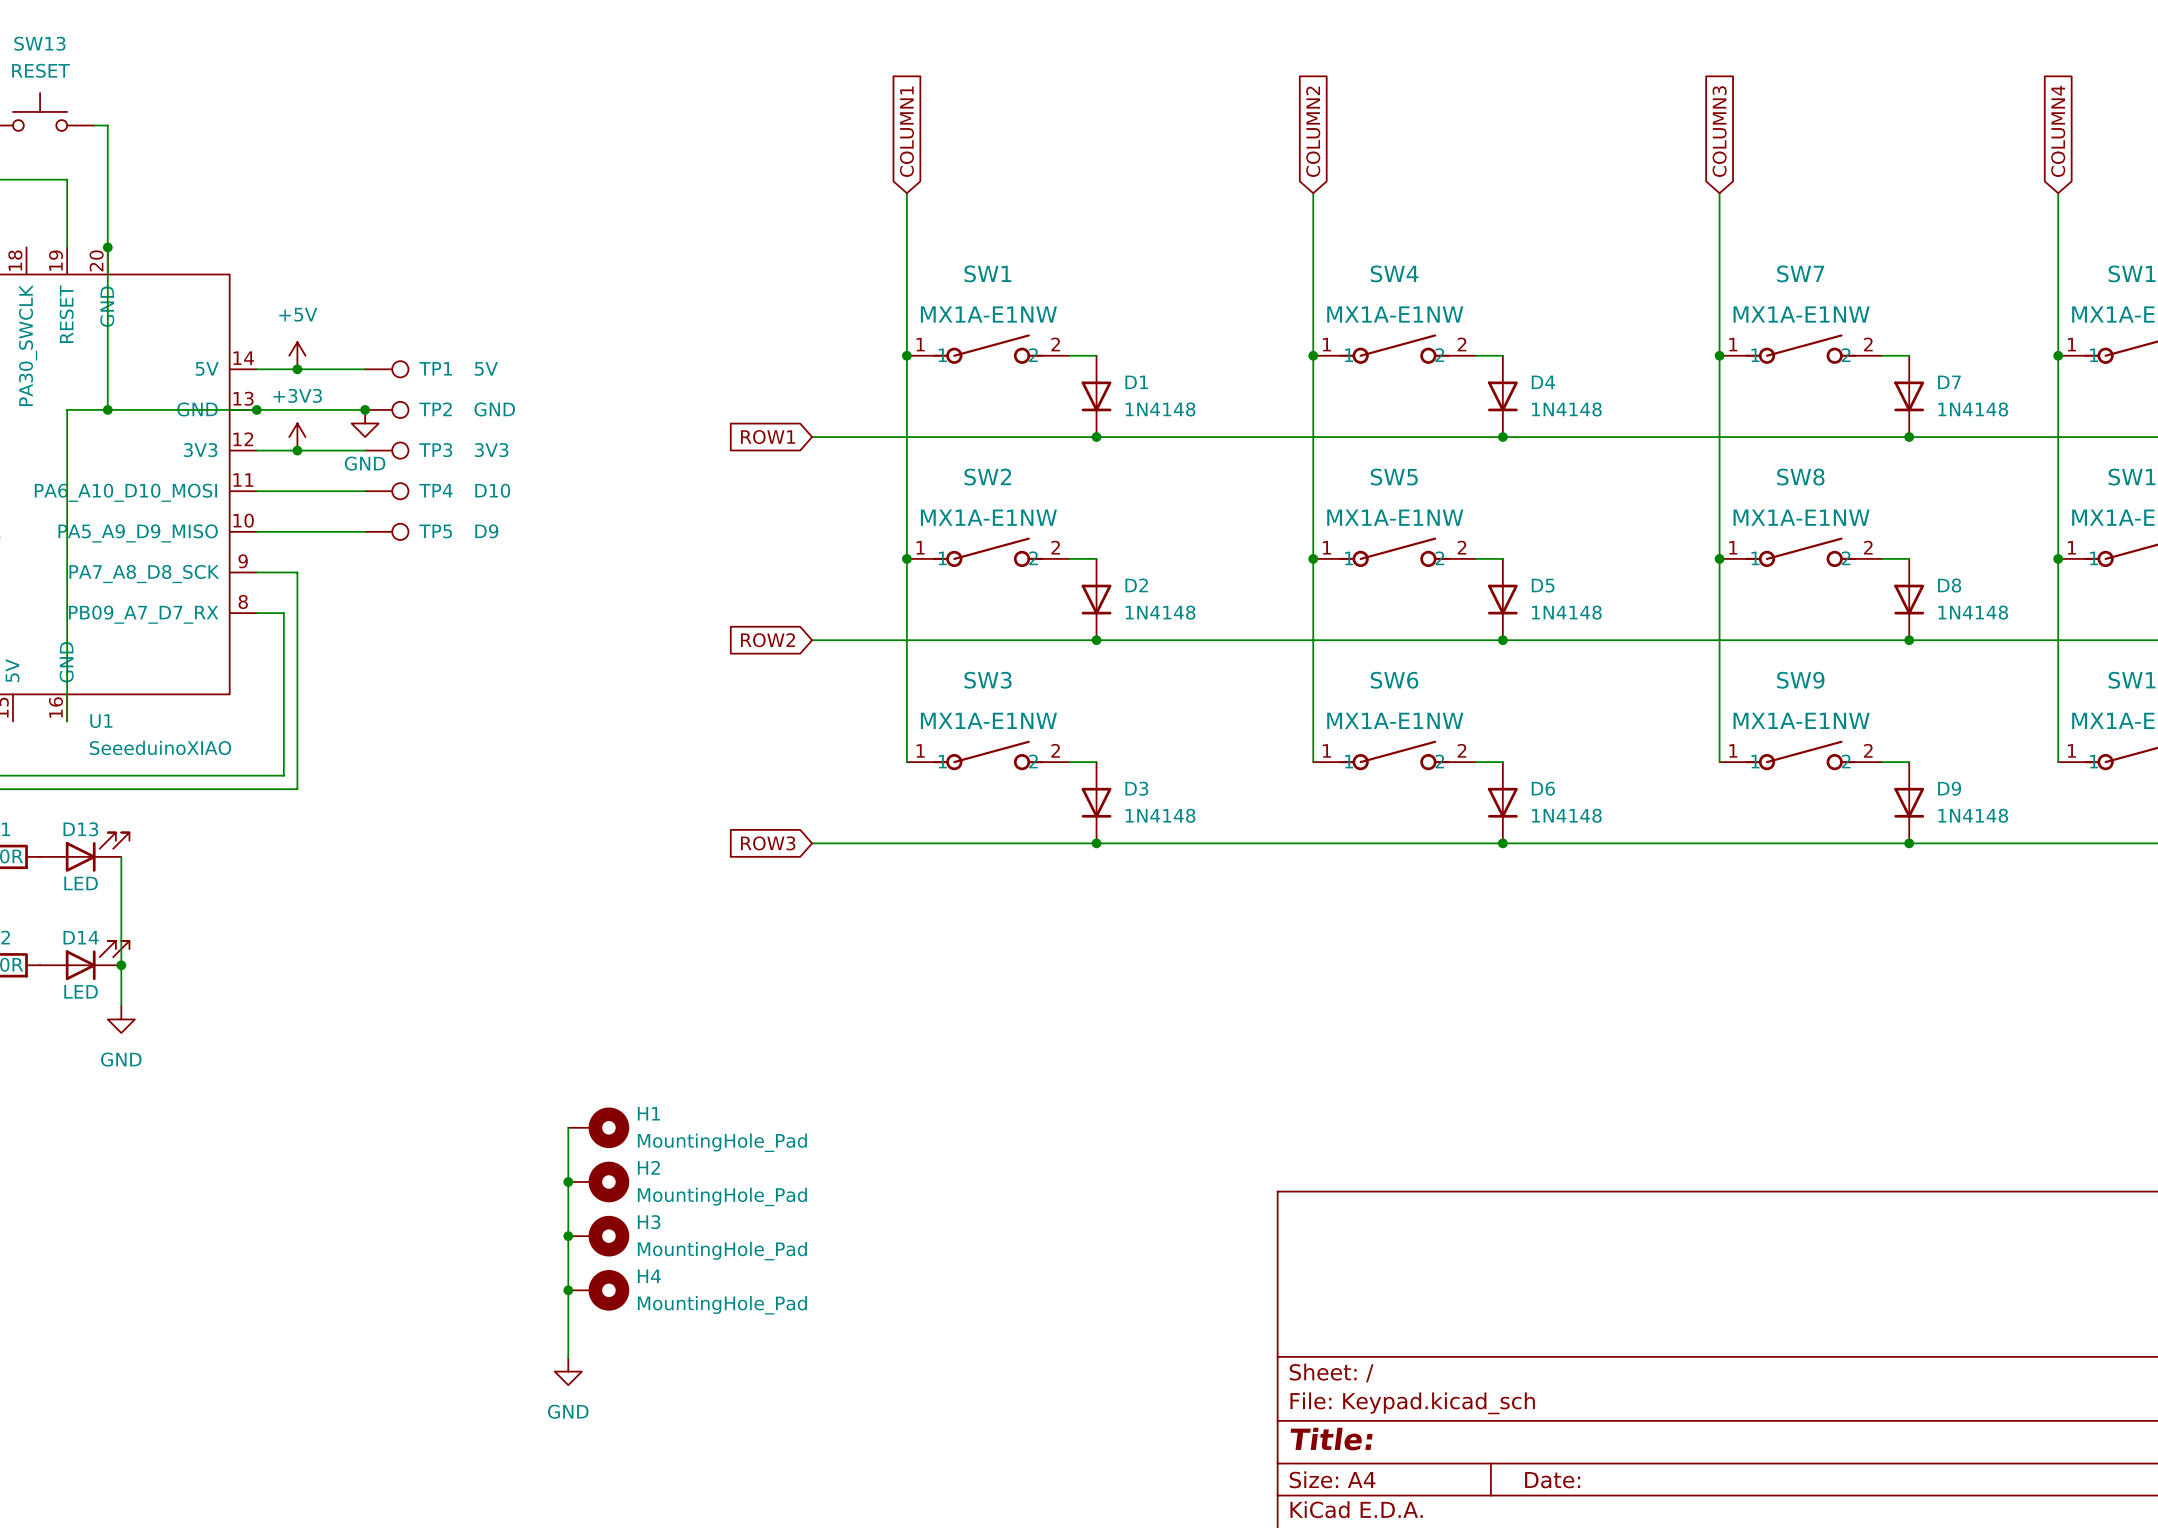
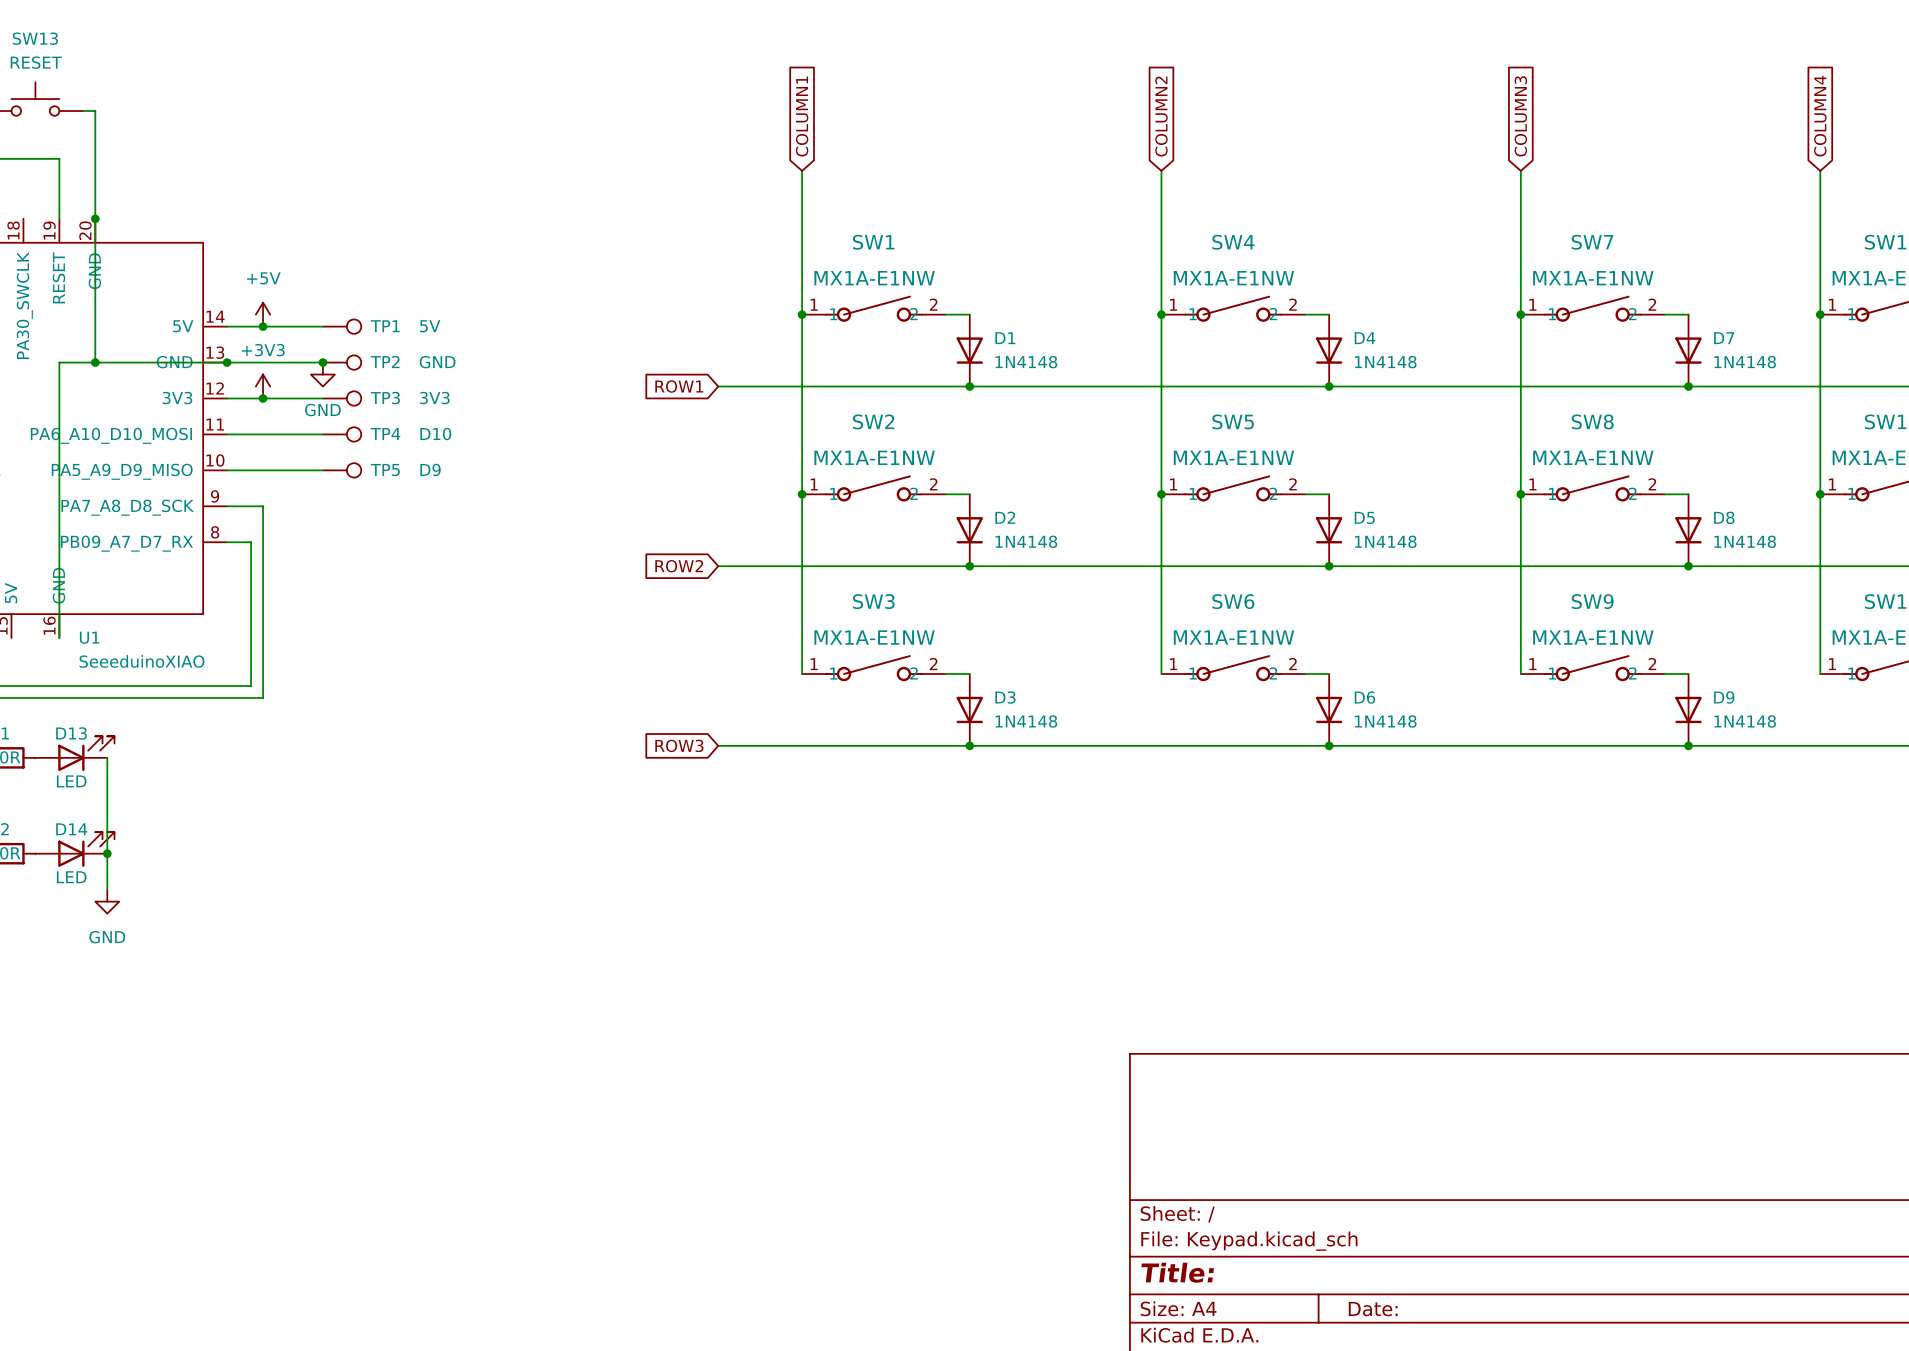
wire: (568, 1127) (568, 1358) -> none
H1: MountingHole_Pad (598, 1127) -> none
junction: (568, 1181) -> none
H2: MountingHole_Pad (598, 1181) -> none
junction: (568, 1236) -> none
H3: MountingHole_Pad (598, 1236) -> none
junction: (568, 1290) -> none
H4: MountingHole_Pad (598, 1290) -> none
power symbol: GND (568, 1371) -> none

